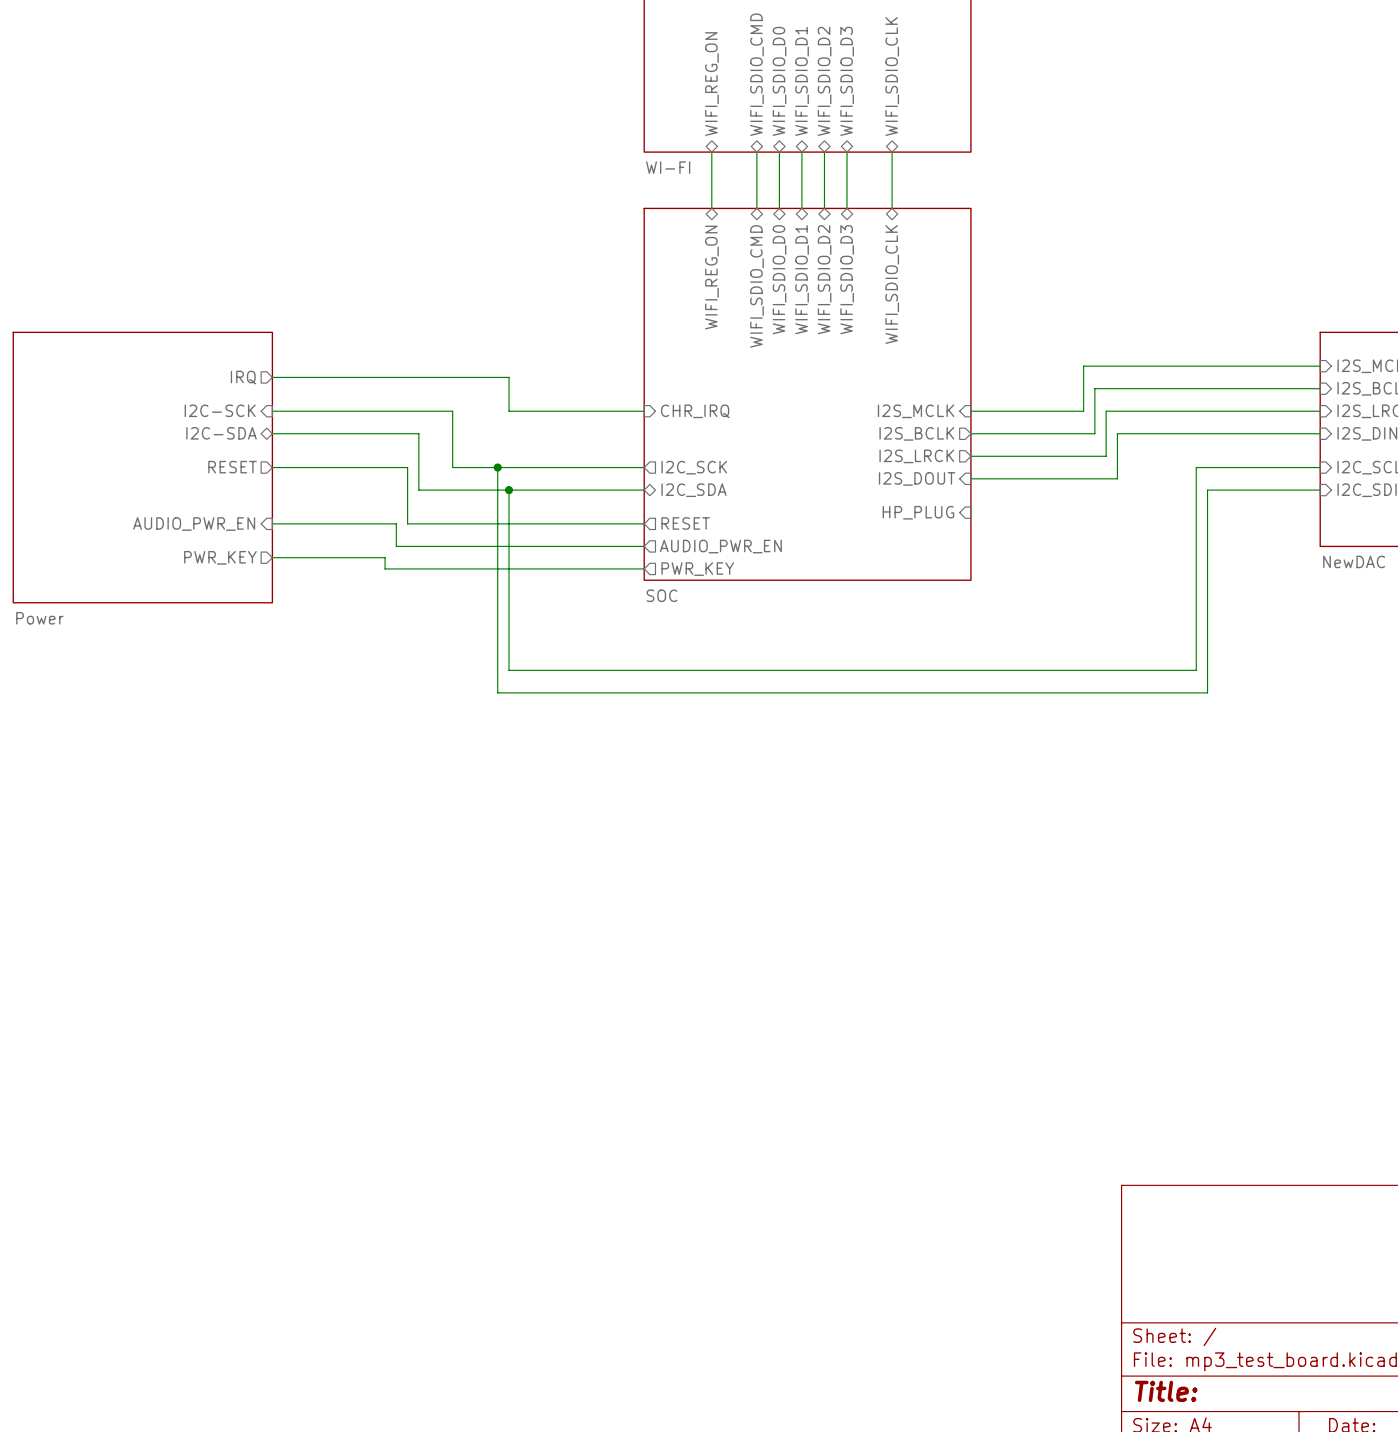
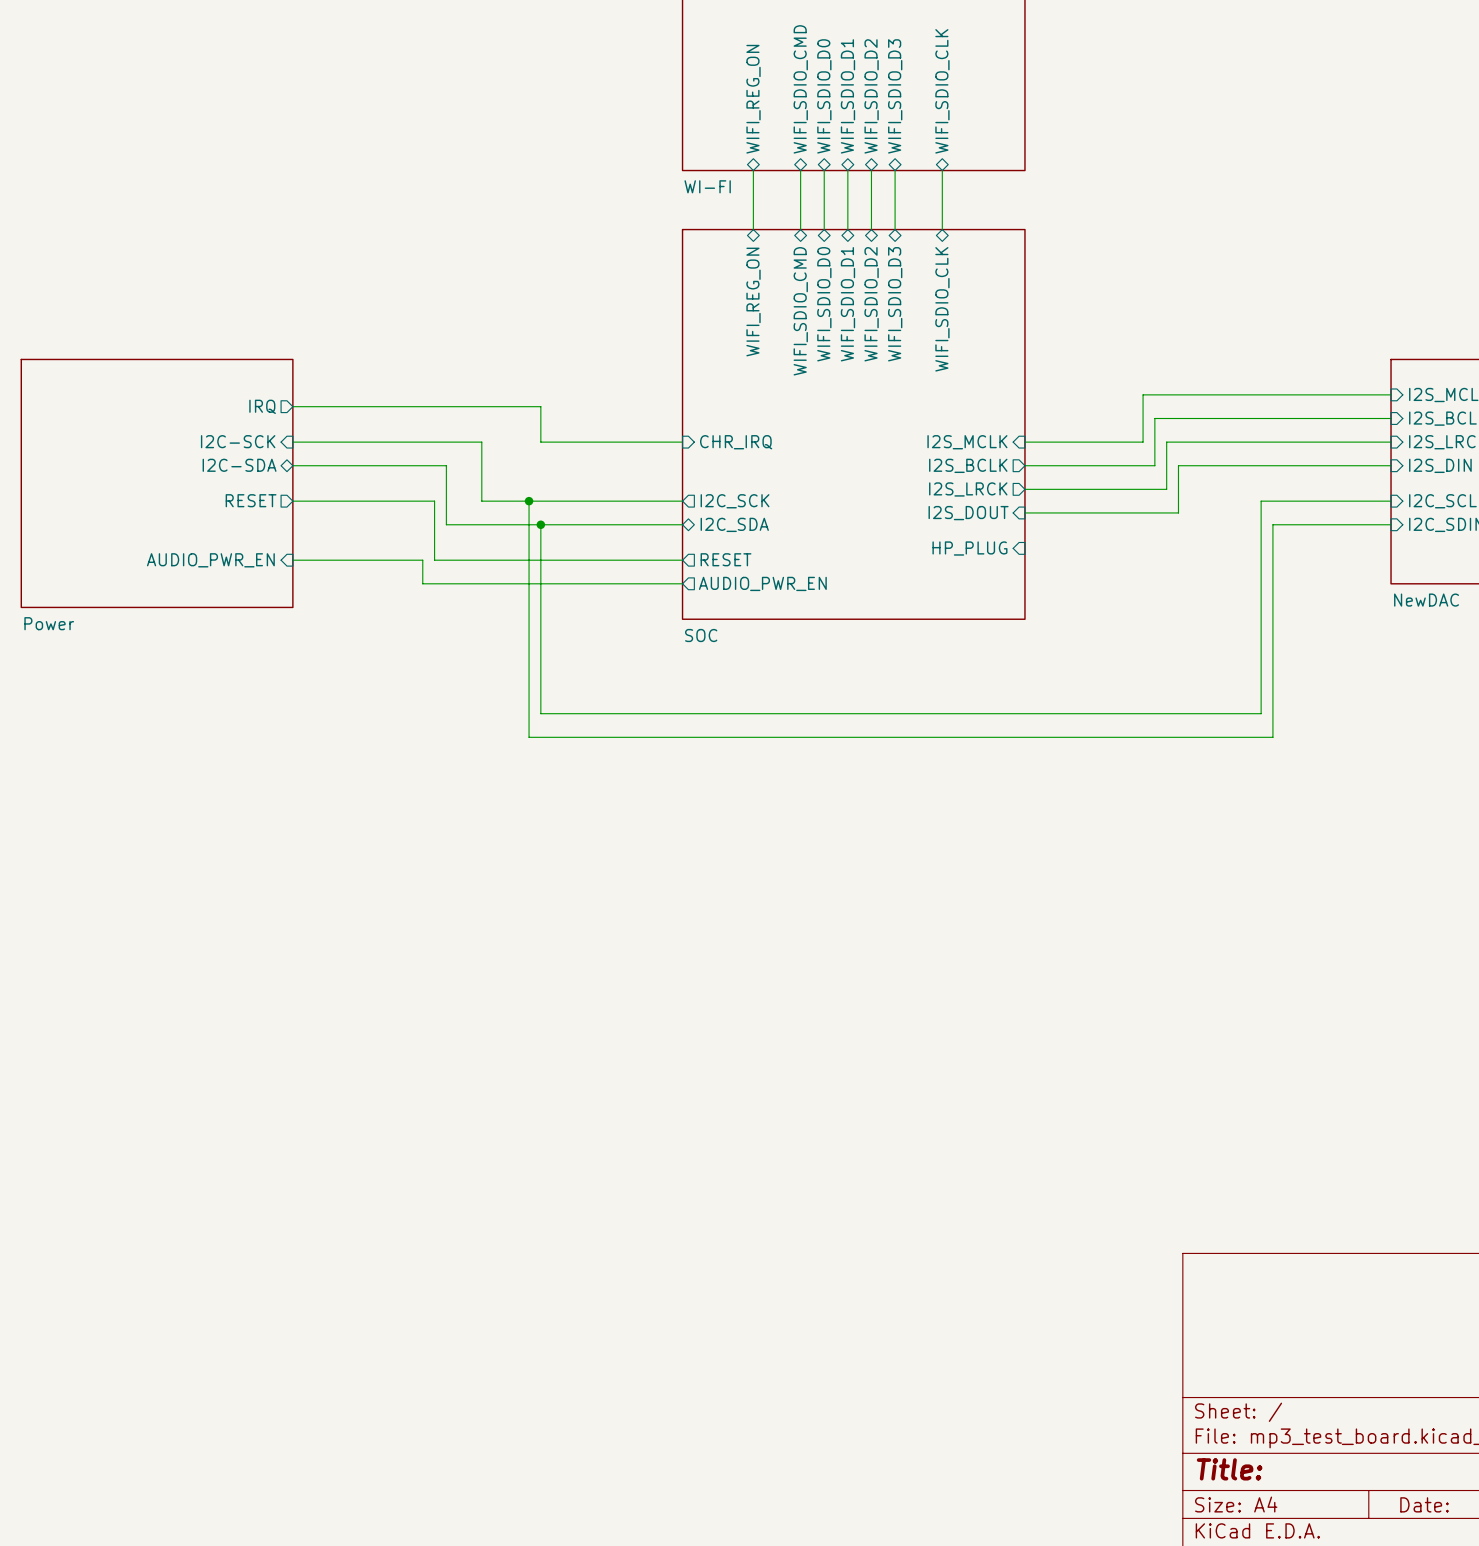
sheet Power: none -> (157, 483)
sheet Power: (142, 467) -> none
sheet pin: PWR_KEY (220, 557) -> none
wire: (272, 557) (385, 557) (385, 568) (644, 568) -> none
sheet pin: PWR_KEY (697, 569) -> none

